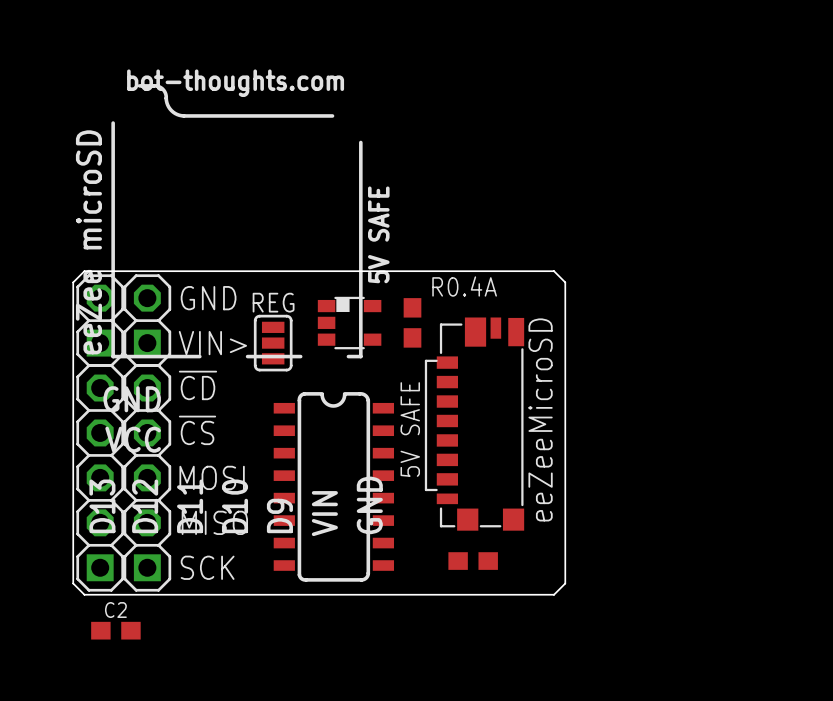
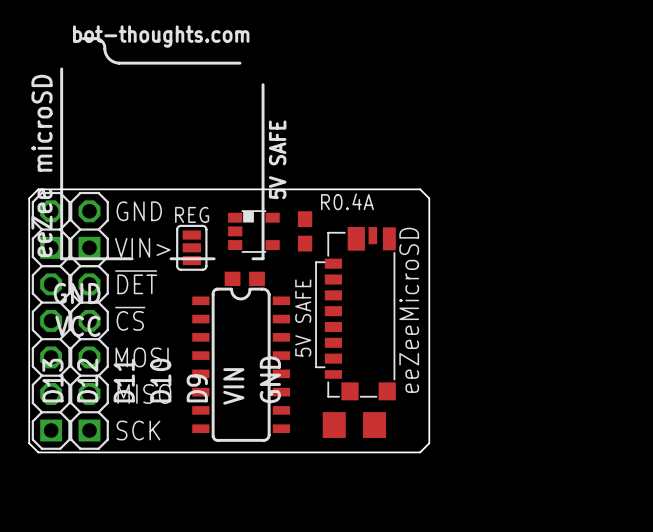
part: none -> (244, 278)
text: ~{CD} (197, 385) -> ~{DET} (136, 282)
part footprint: [448, 552, 498, 570] -> [322, 412, 387, 438]
C2: (115, 630) -> none

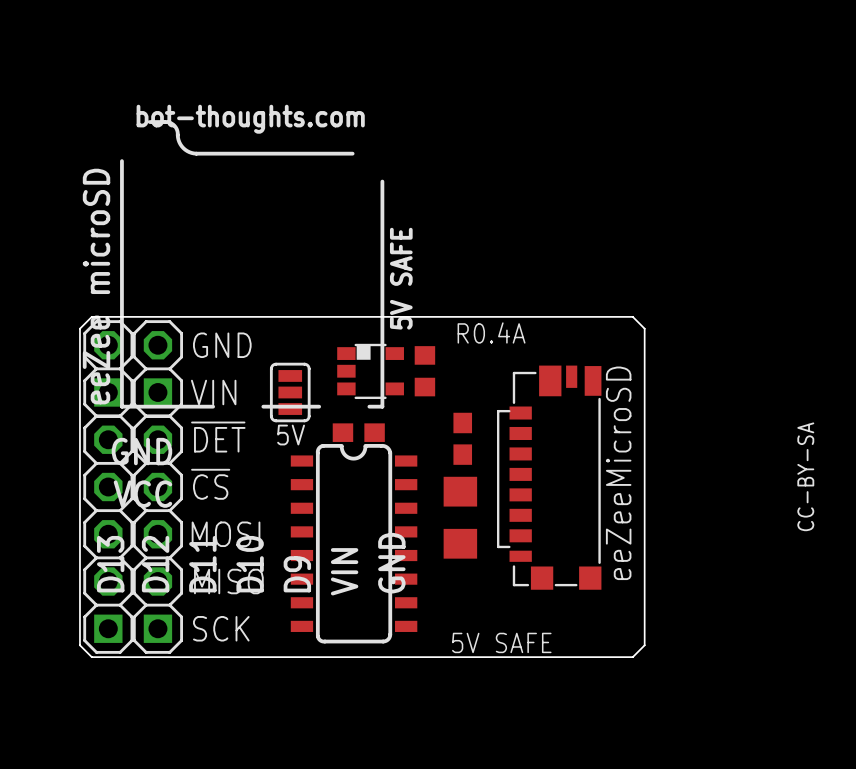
board edge: (420, 189) (429, 198) (429, 443) (420, 452) -> (585, 316) (632, 316) (644, 328) (644, 645) (632, 657) (585, 657)
part footprint: [297, 211, 313, 252] -> [414, 346, 436, 397]
REG name: REG (192, 214) -> 5V (291, 435)
text: VIN> (142, 247) -> VIN (213, 392)
part: none -> (462, 438)
text position: eeZeeMicroSD (409, 310) -> eeZeeMicroSD (618, 473)
part position: (355, 313) -> (549, 477)
text: none -> CC-BY-SA (805, 476)
text rotation: 0° (303, 318) -> 90° clockwise (501, 642)
text position: 5V SAFE (303, 318) -> 5V SAFE (501, 642)
part rotation: 0° (354, 425) -> 90° clockwise (460, 517)
part position: (354, 425) -> (460, 517)

